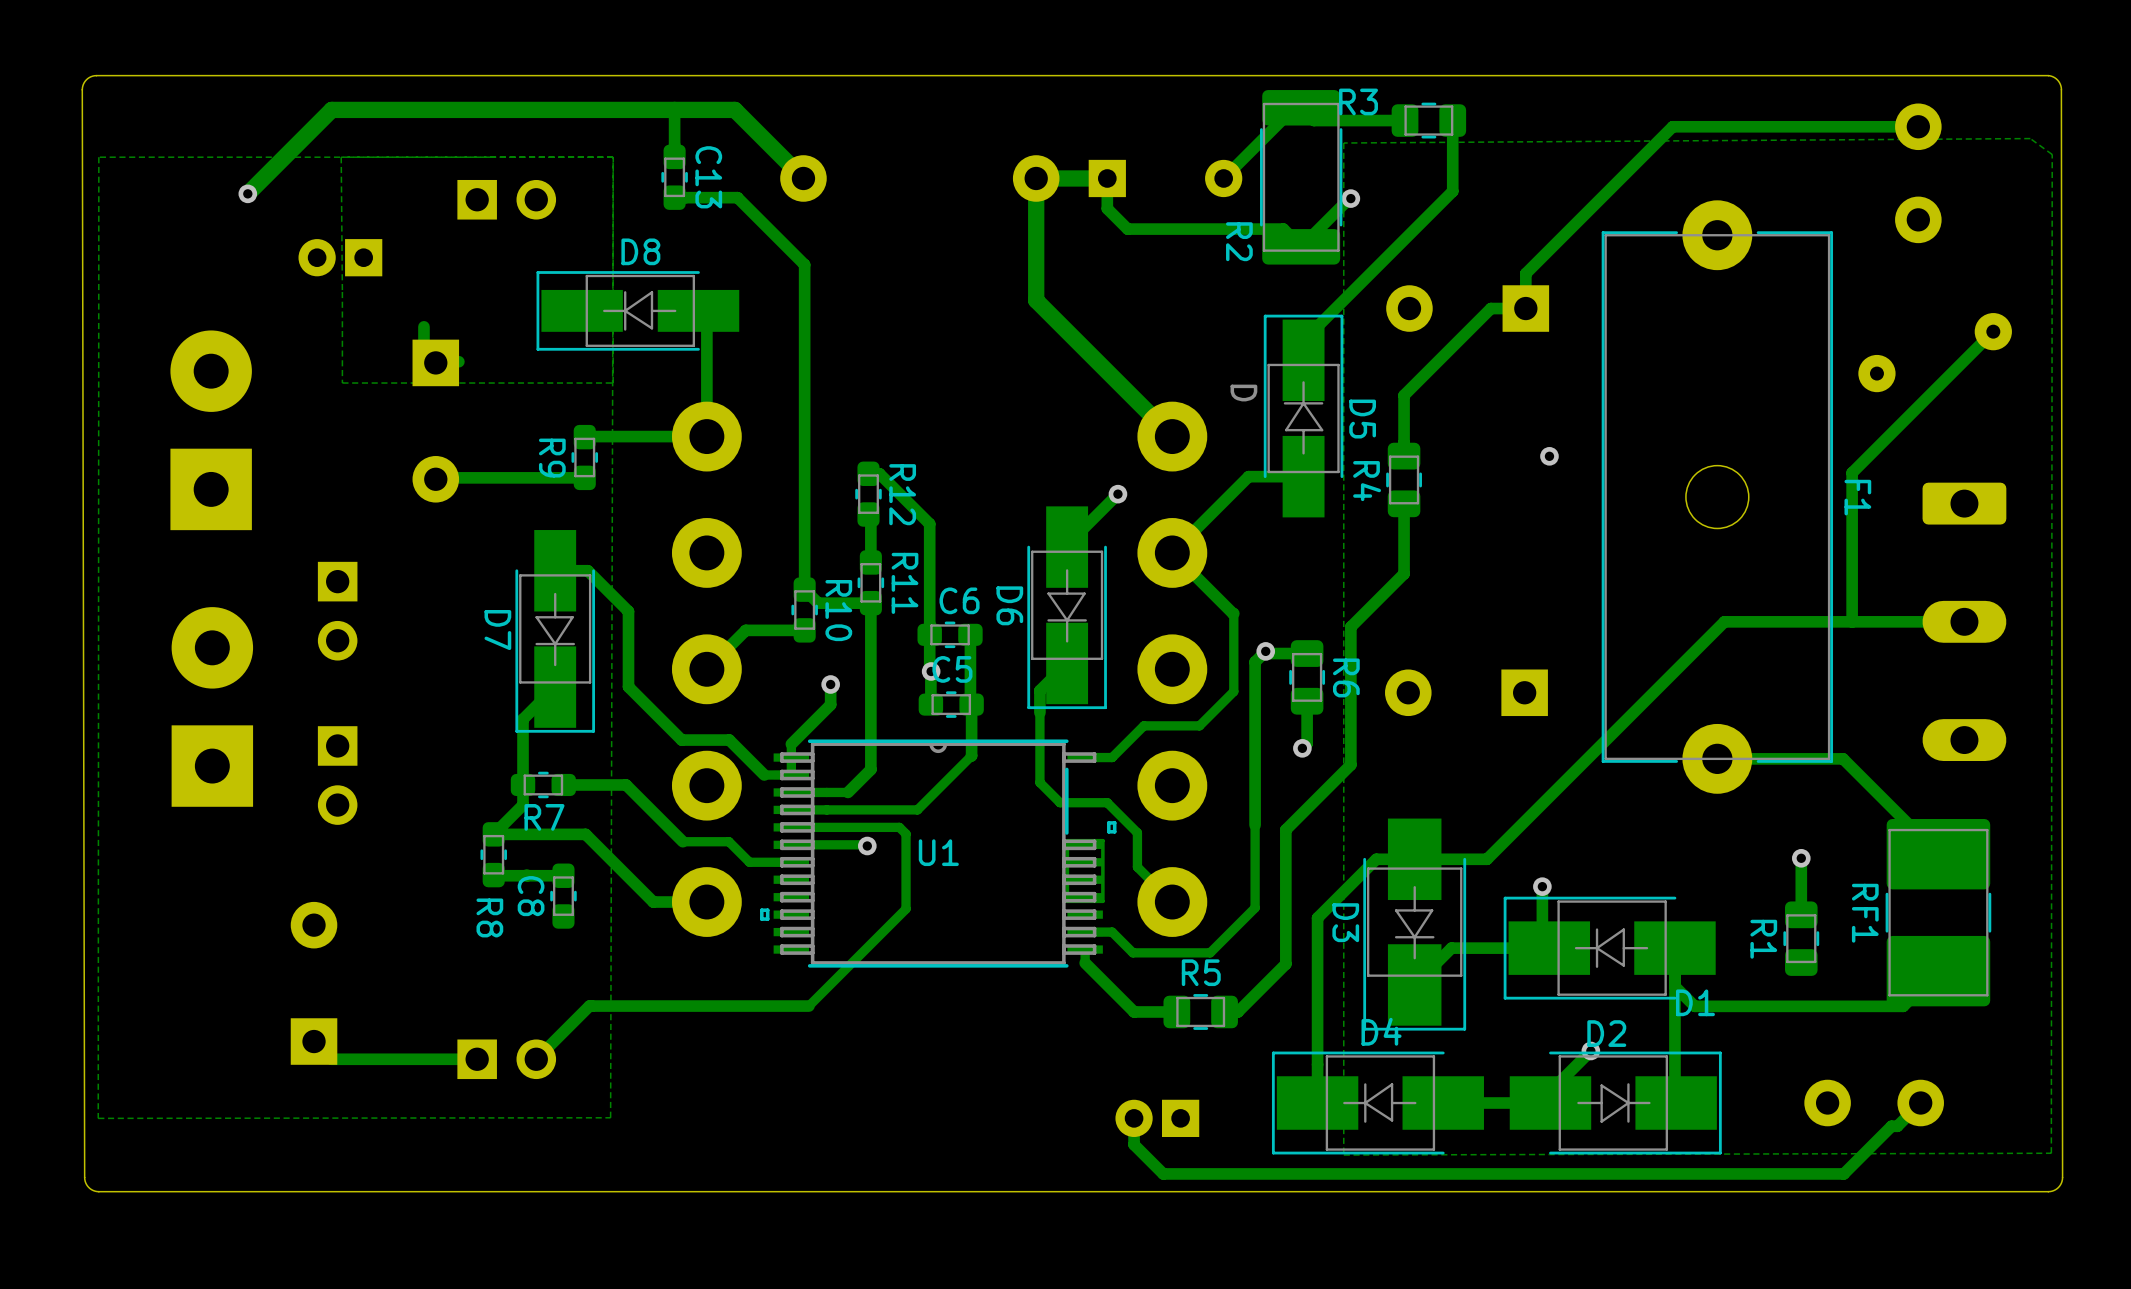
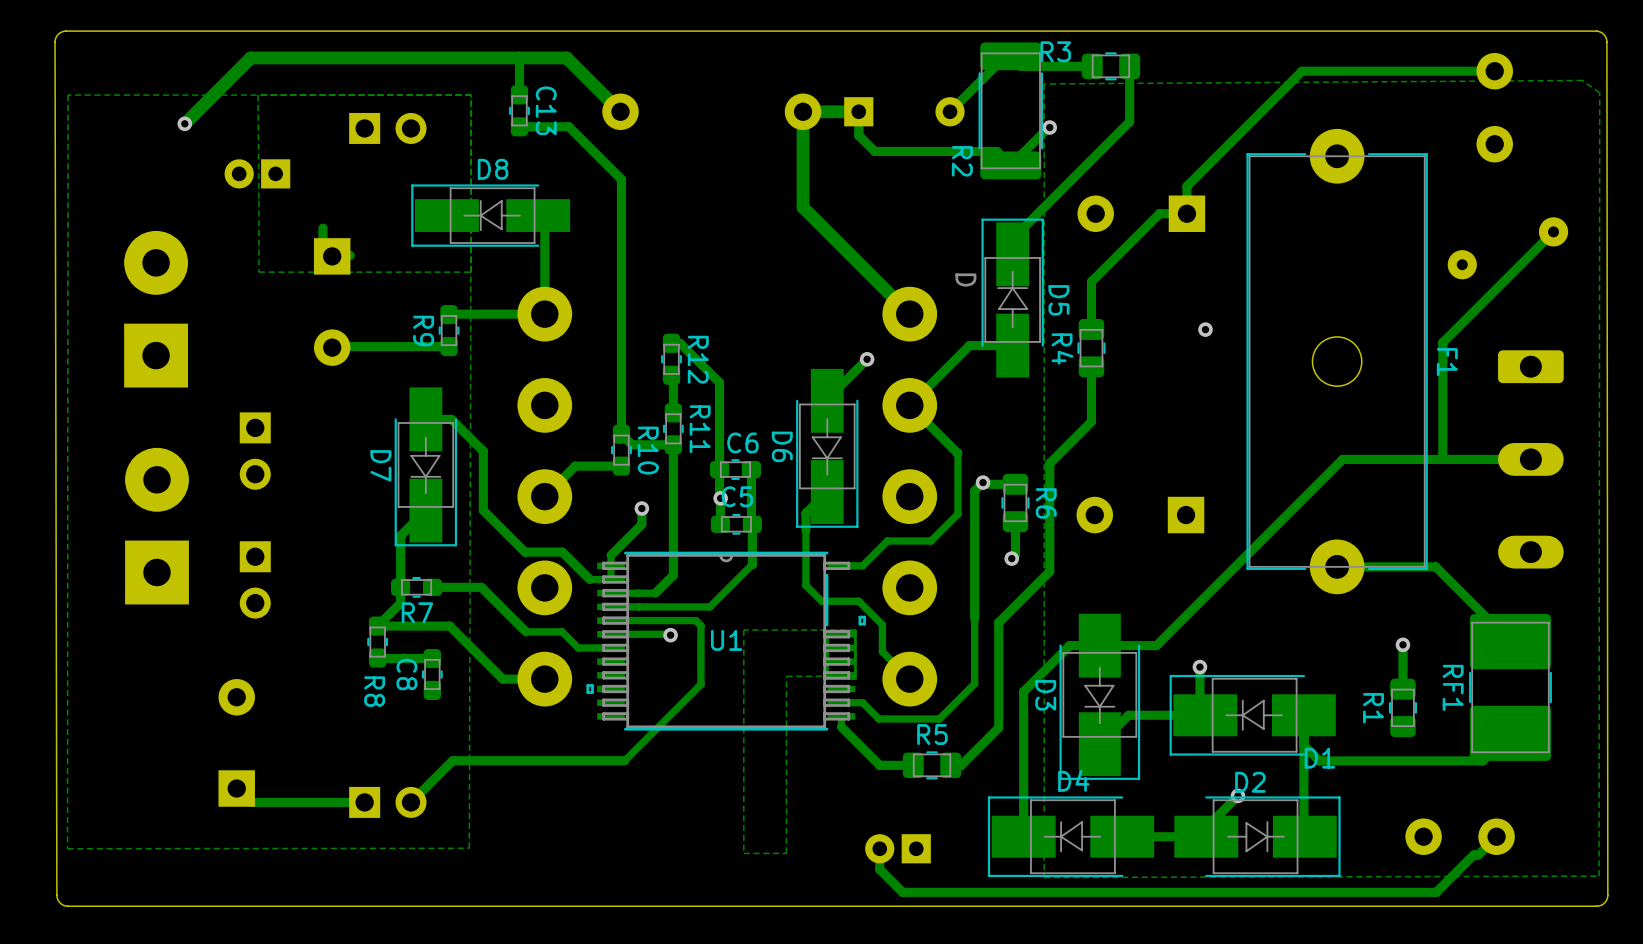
zone outline: none -> (856, 629) (856, 676) (786, 676) (786, 853) (743, 853) (743, 629) (856, 629)

